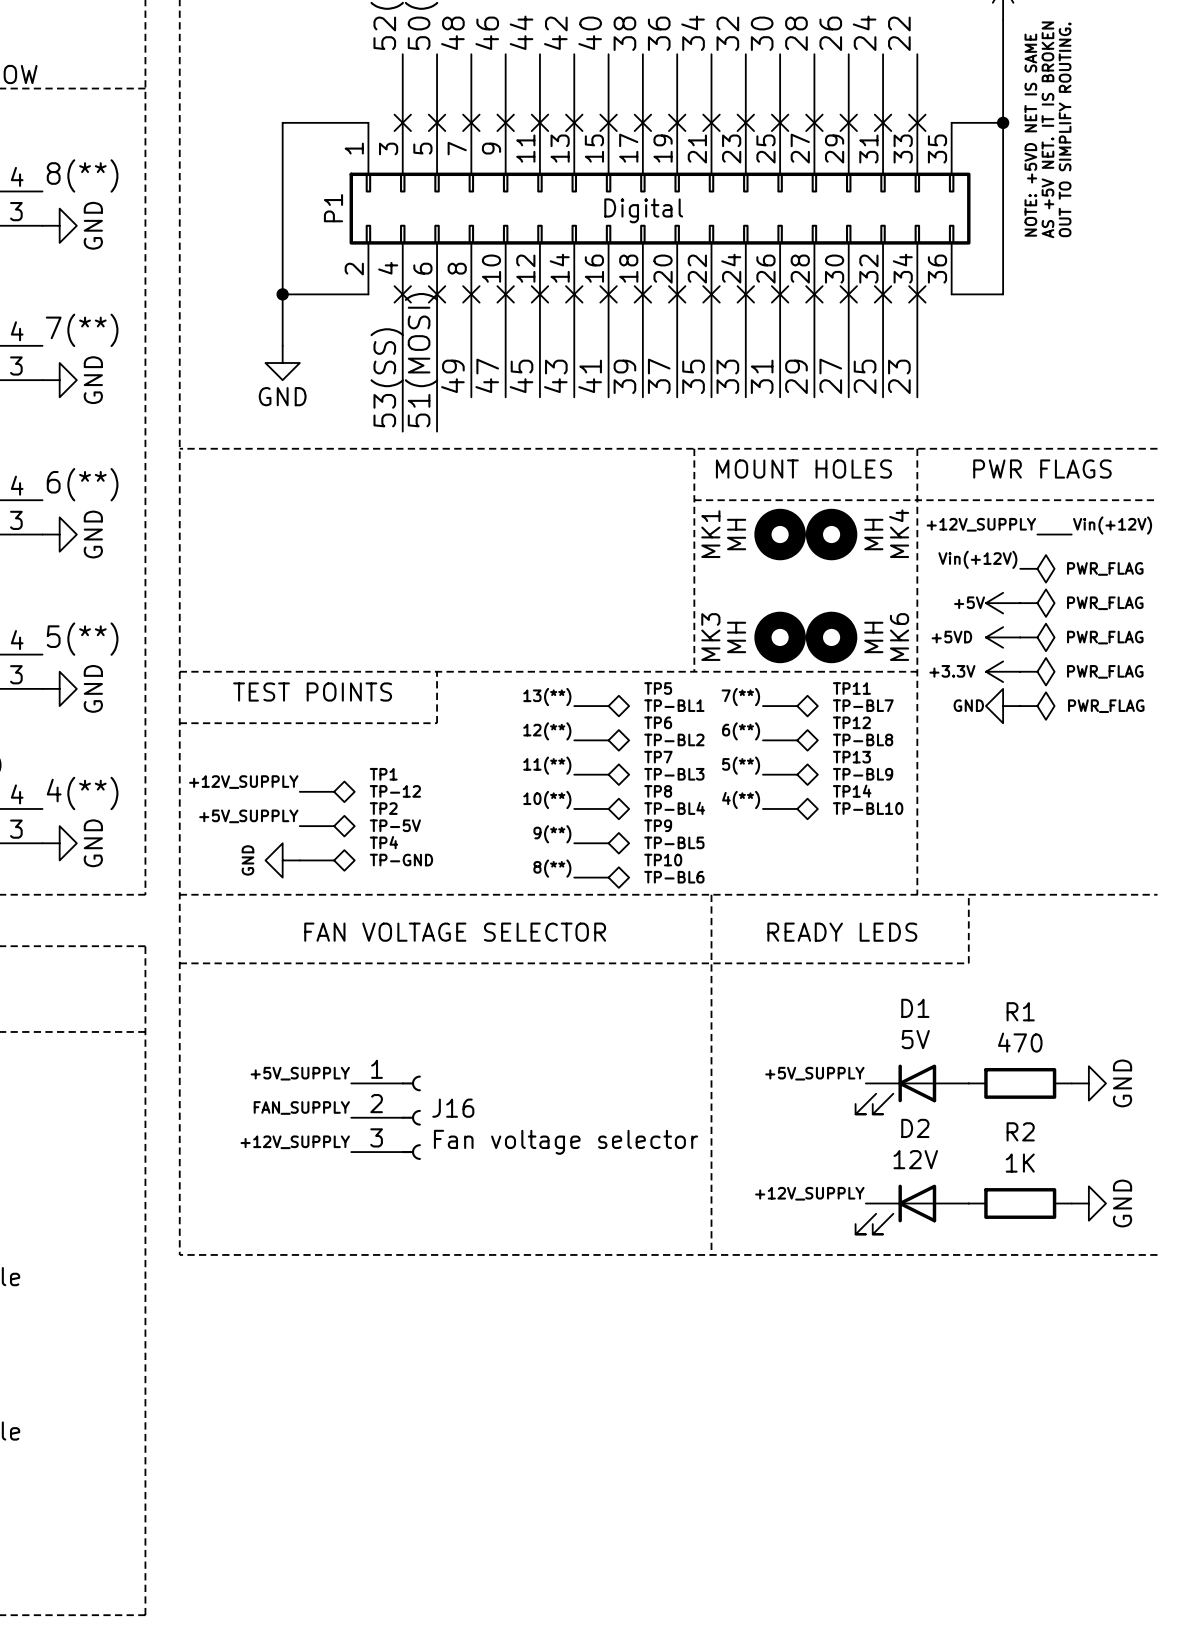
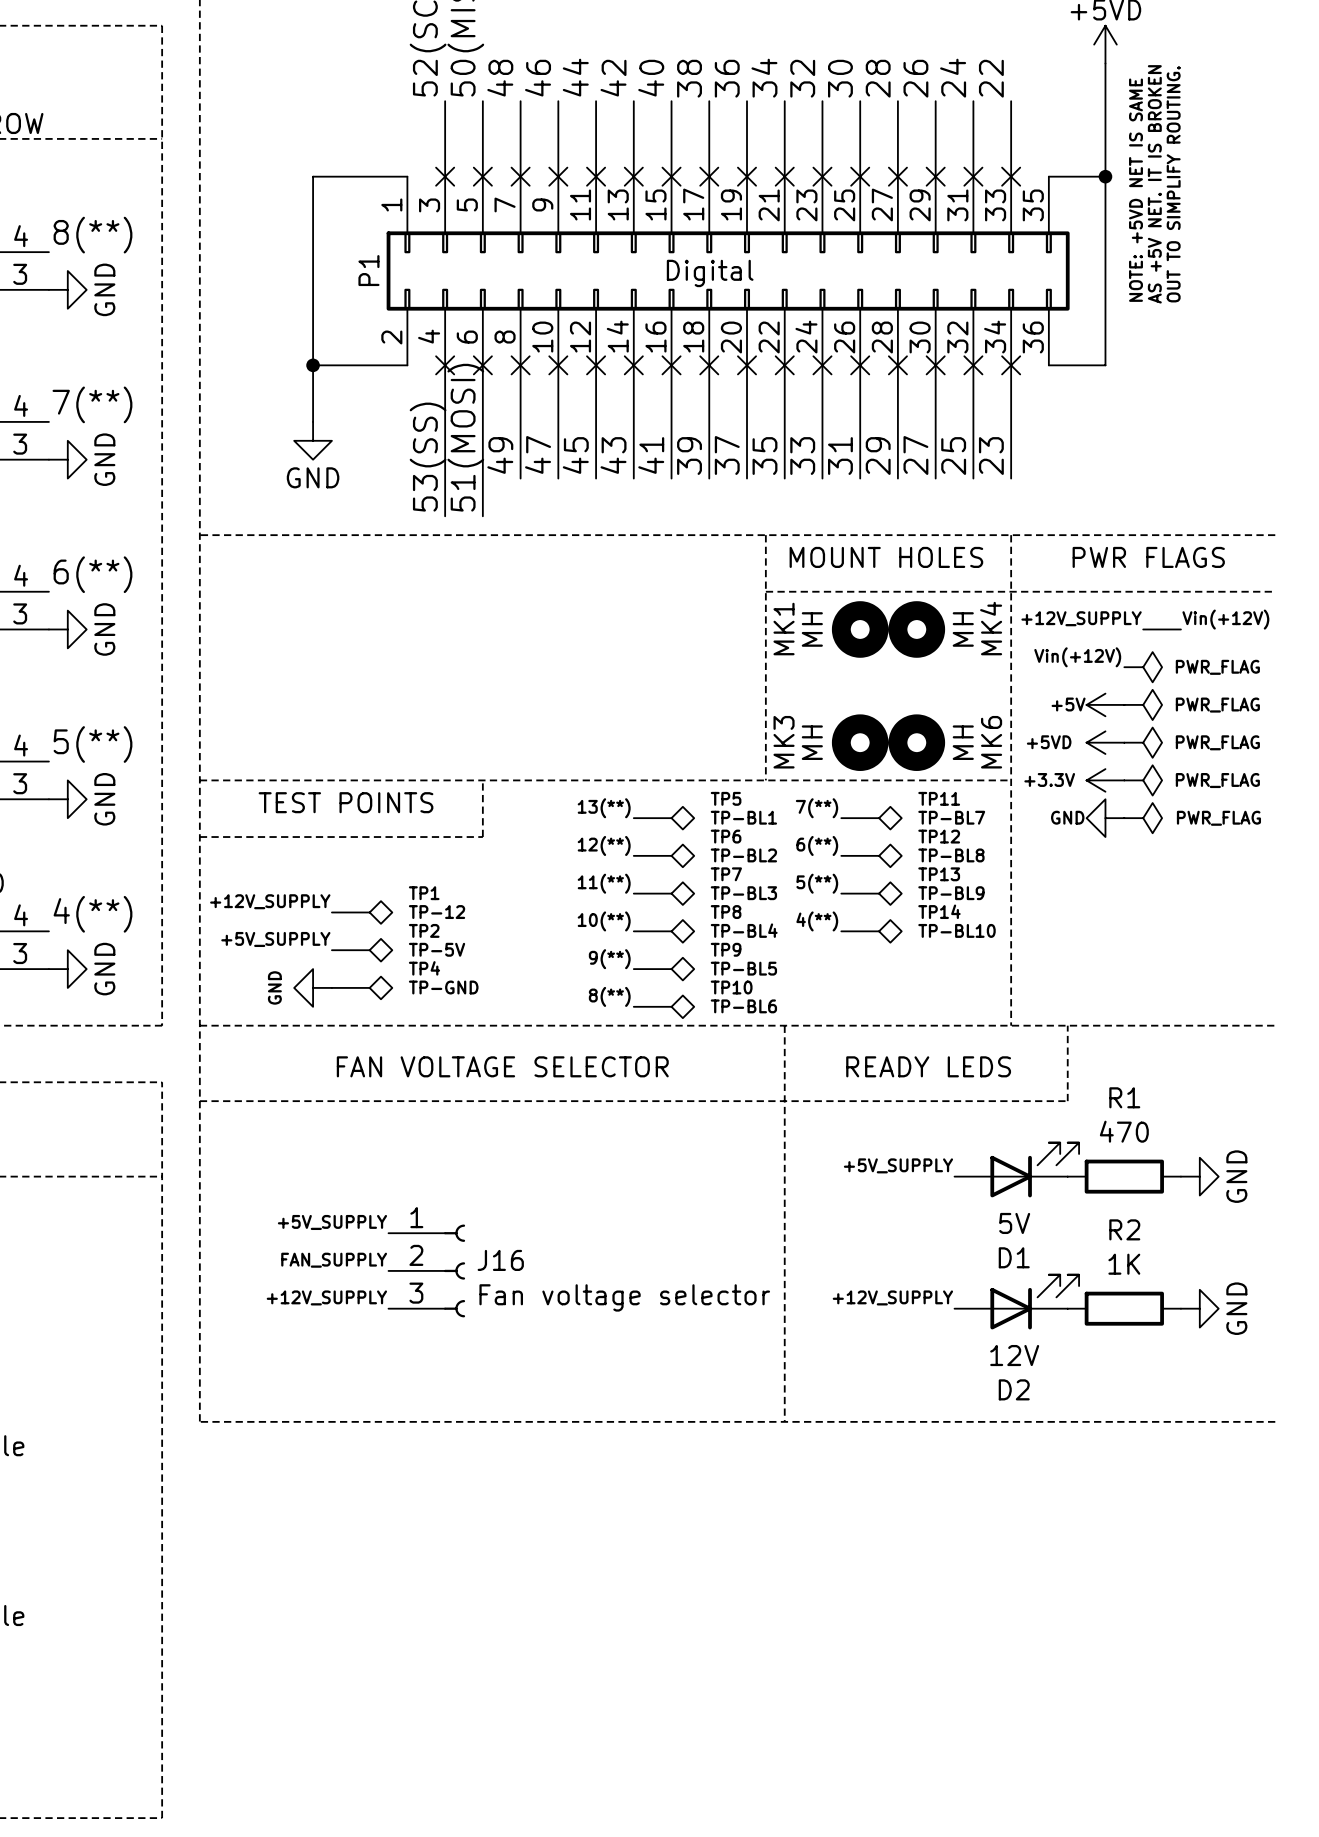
power symbol: none -> GND (1199, 1176)
label position: +5V_SUPPLY (814, 1073) -> +5V_SUPPLY (898, 1165)
R1 position: (1020, 1083) -> (1124, 1176)
power symbol: GND (1088, 1083) -> none
D1 rotation: 0° (895, 1089) -> 180° (1034, 1170)
power symbol: none -> GND (1199, 1308)
label position: +12V_SUPPLY (809, 1193) -> +12V_SUPPLY (892, 1297)
R2 position: (1020, 1203) -> (1124, 1308)
power symbol: GND (1088, 1203) -> none
D2 rotation: 0° (895, 1209) -> 180° (1034, 1302)

